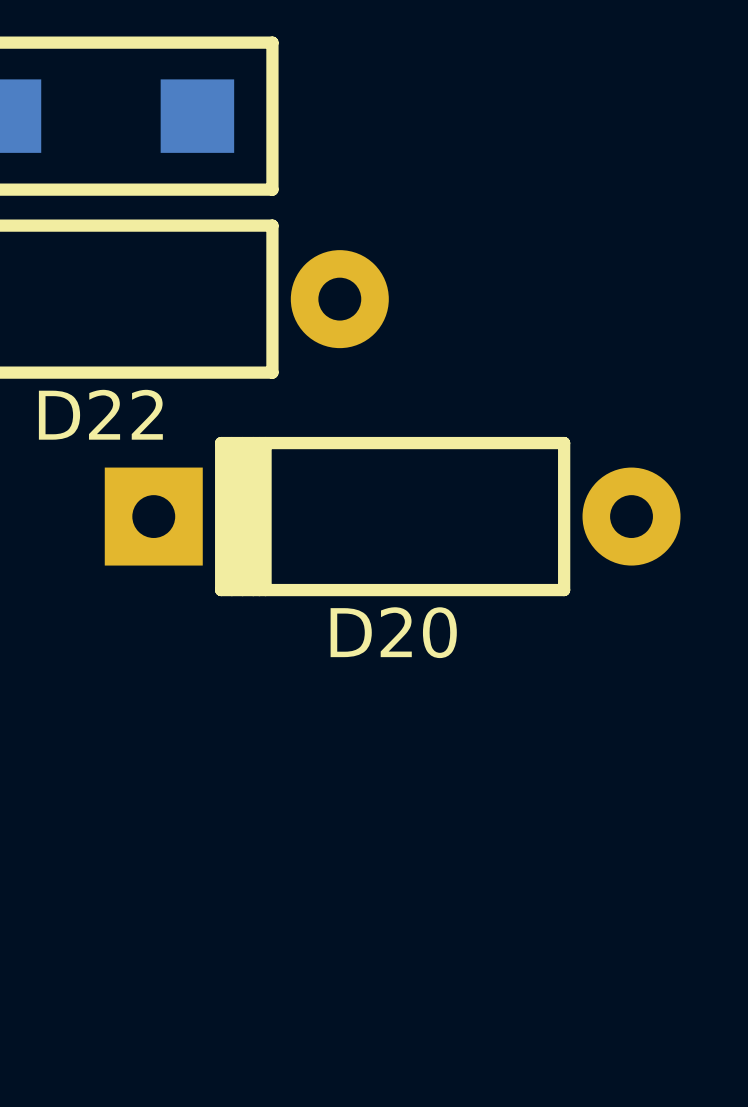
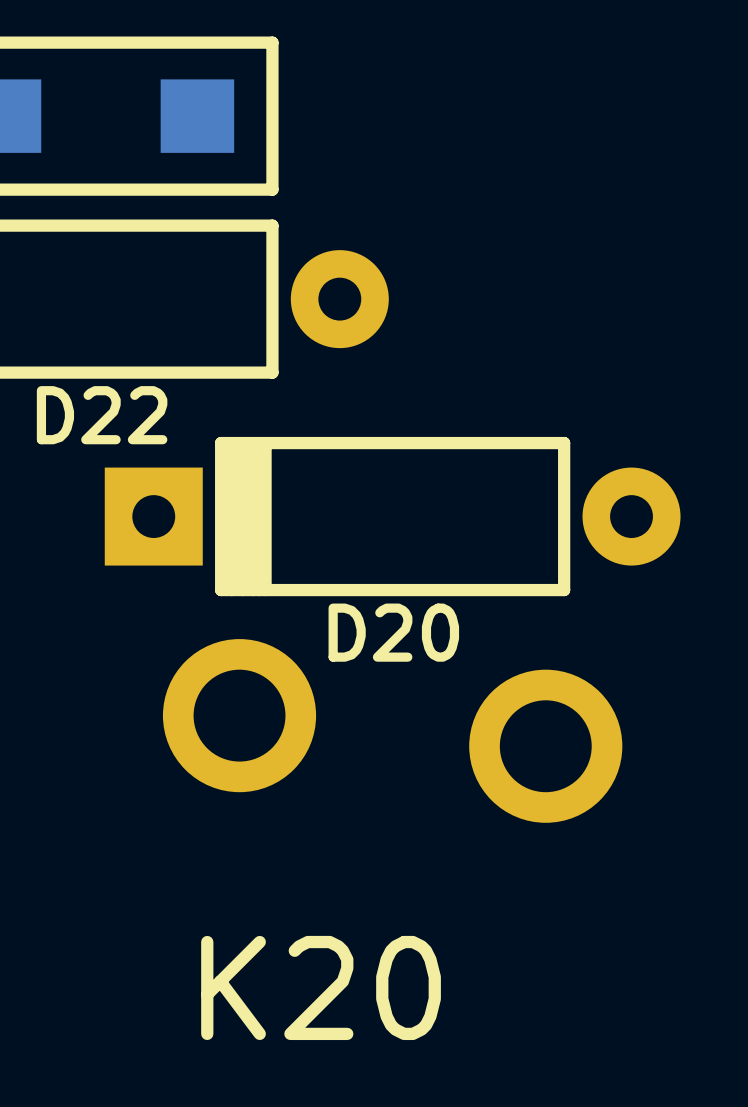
K20: none -> (392, 730)

